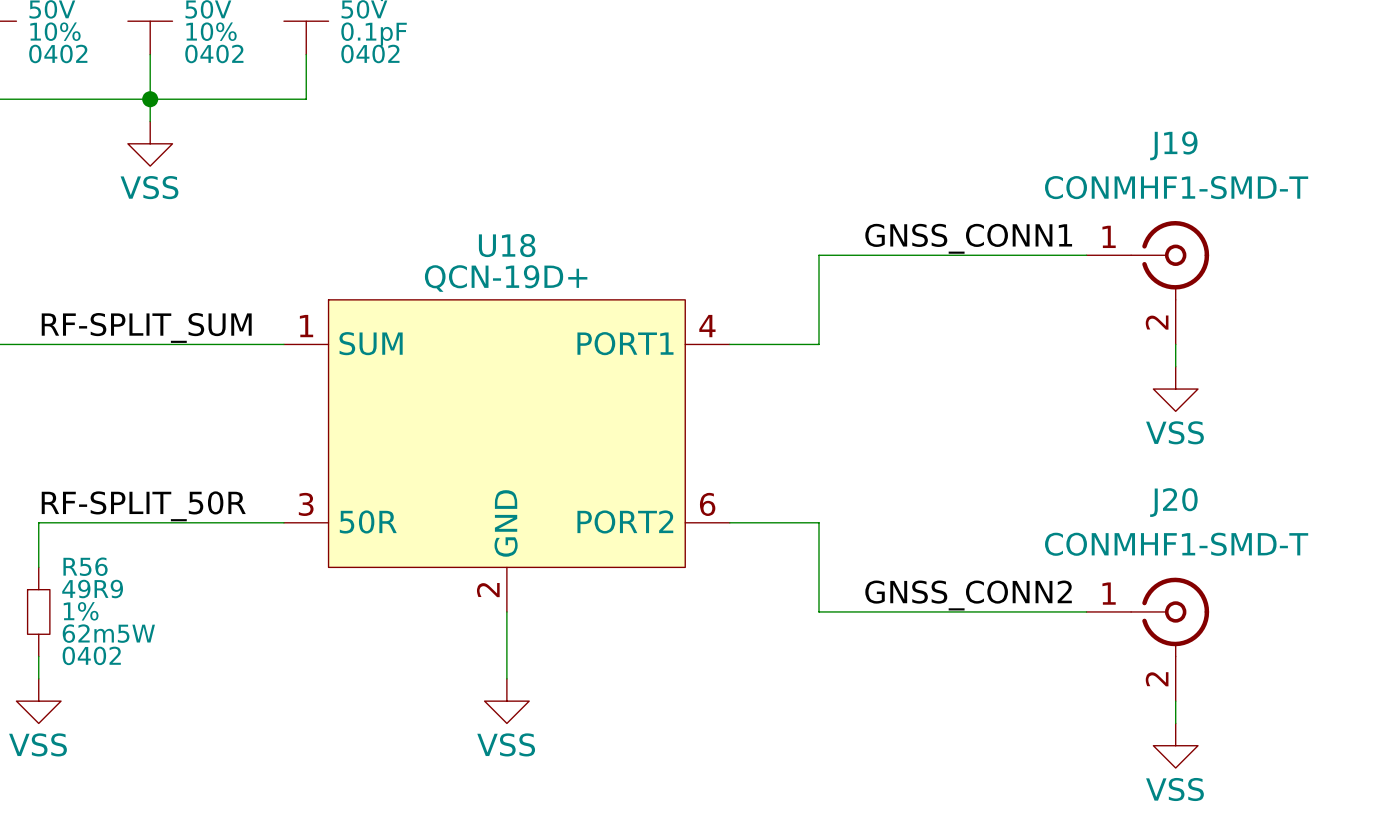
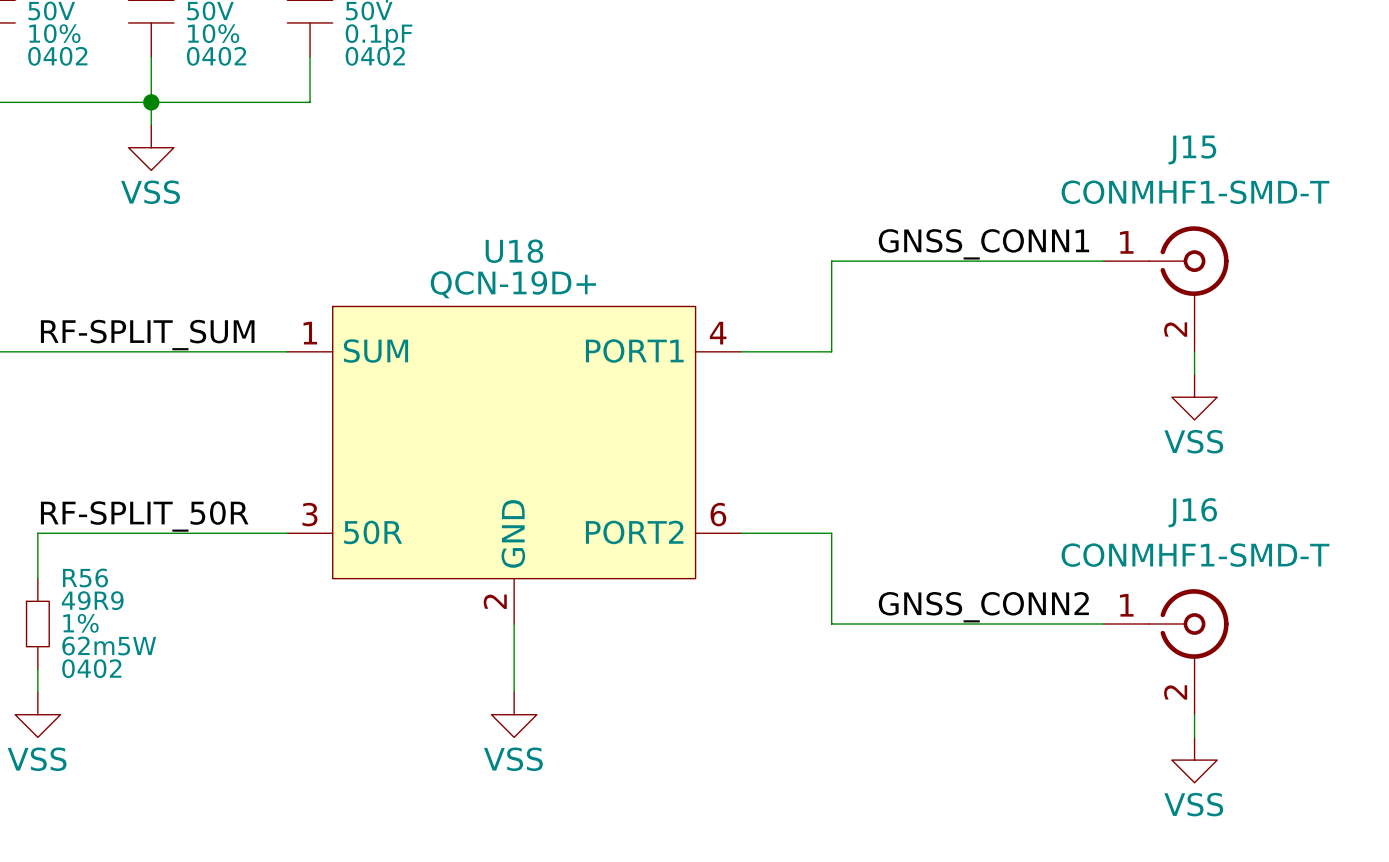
J19 name: J19 (1173, 145) -> J15 (1192, 149)
J20 name: J20 (1173, 502) -> J16 (1192, 512)

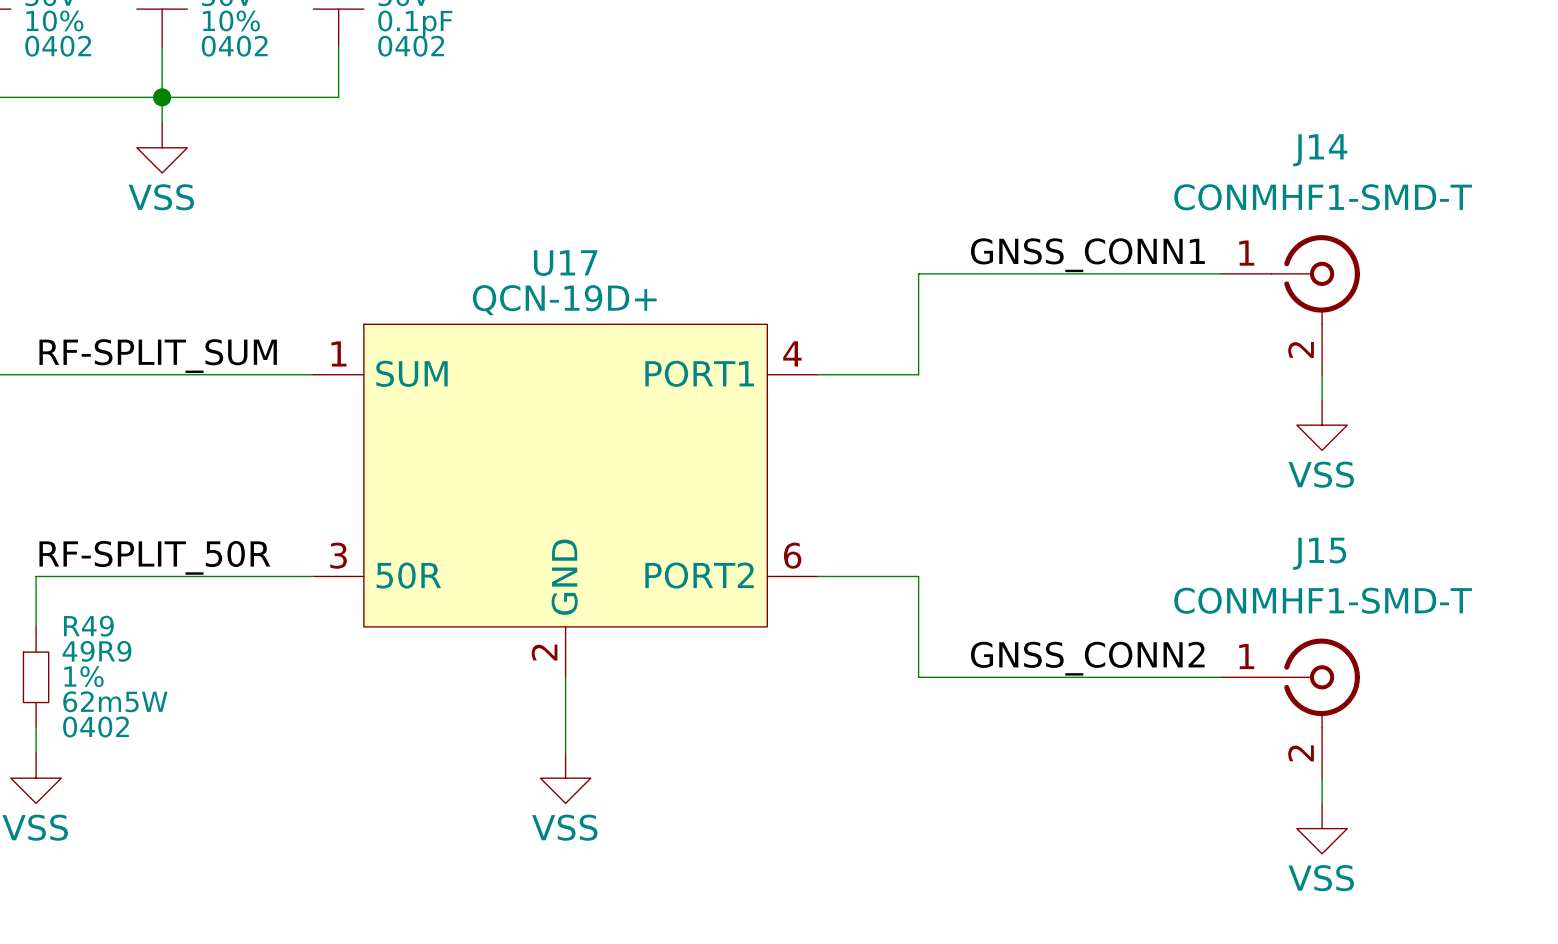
J15 name: J15 (1192, 149) -> J14 (1320, 150)
U18 name: U18 (514, 251) -> U17 (565, 263)
J16 name: J16 (1192, 512) -> J15 (1319, 553)
R56 name: R56 (85, 577) -> R49 (88, 626)

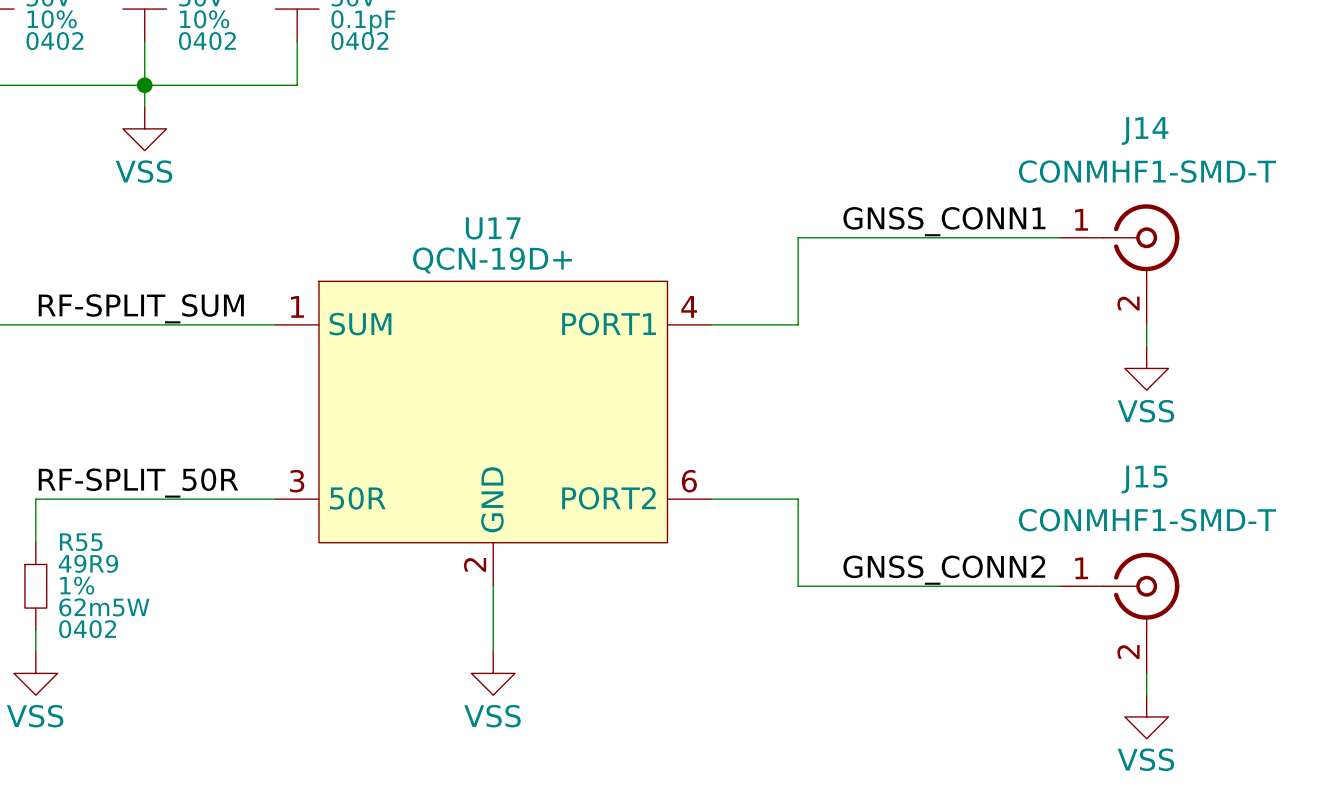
R49 name: R49 (88, 626) -> R55 (81, 542)

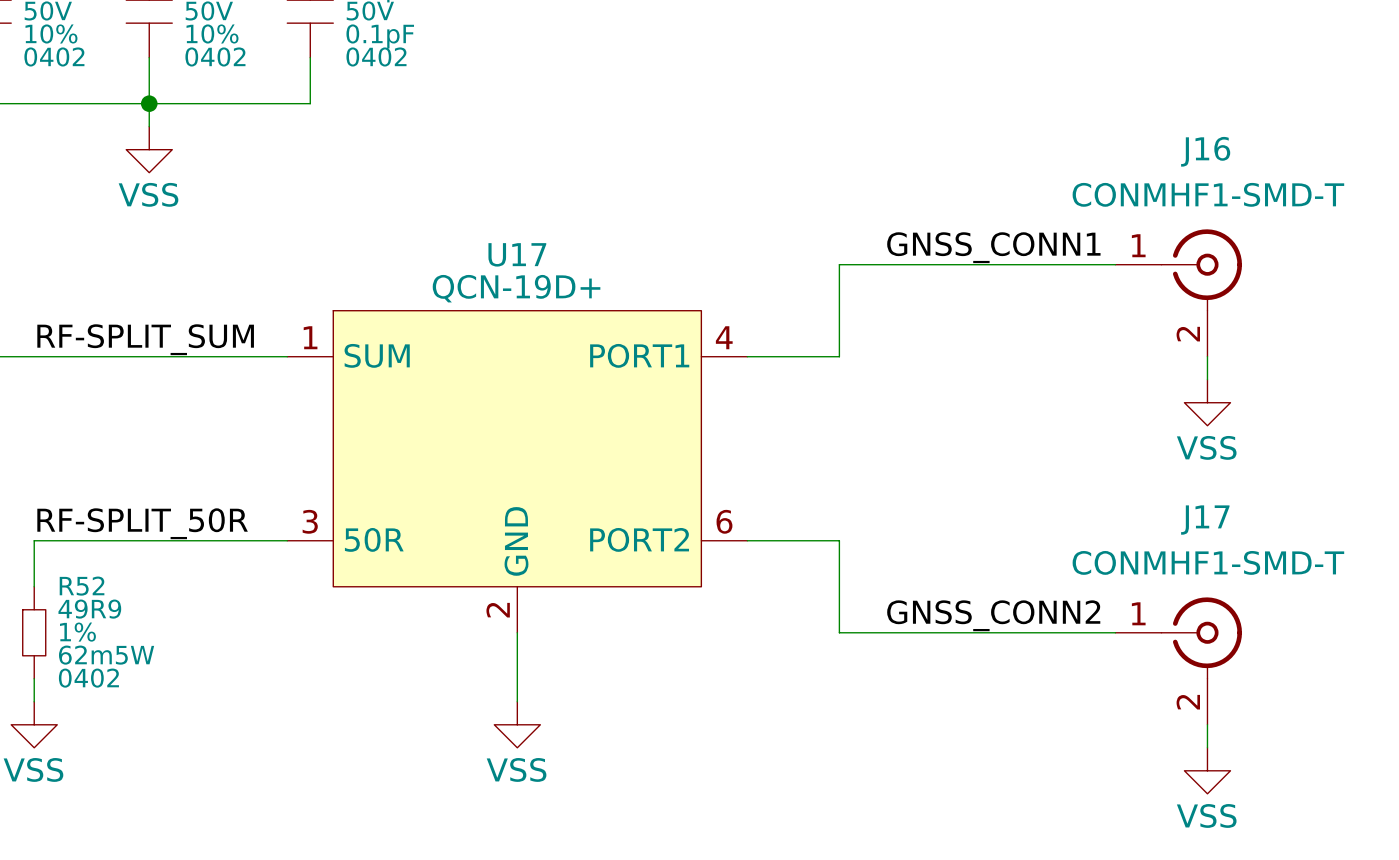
J14 name: J14 (1145, 131) -> J16 (1205, 151)
J15 name: J15 (1144, 479) -> J17 (1205, 520)
R55 name: R55 (81, 542) -> R52 (82, 586)

